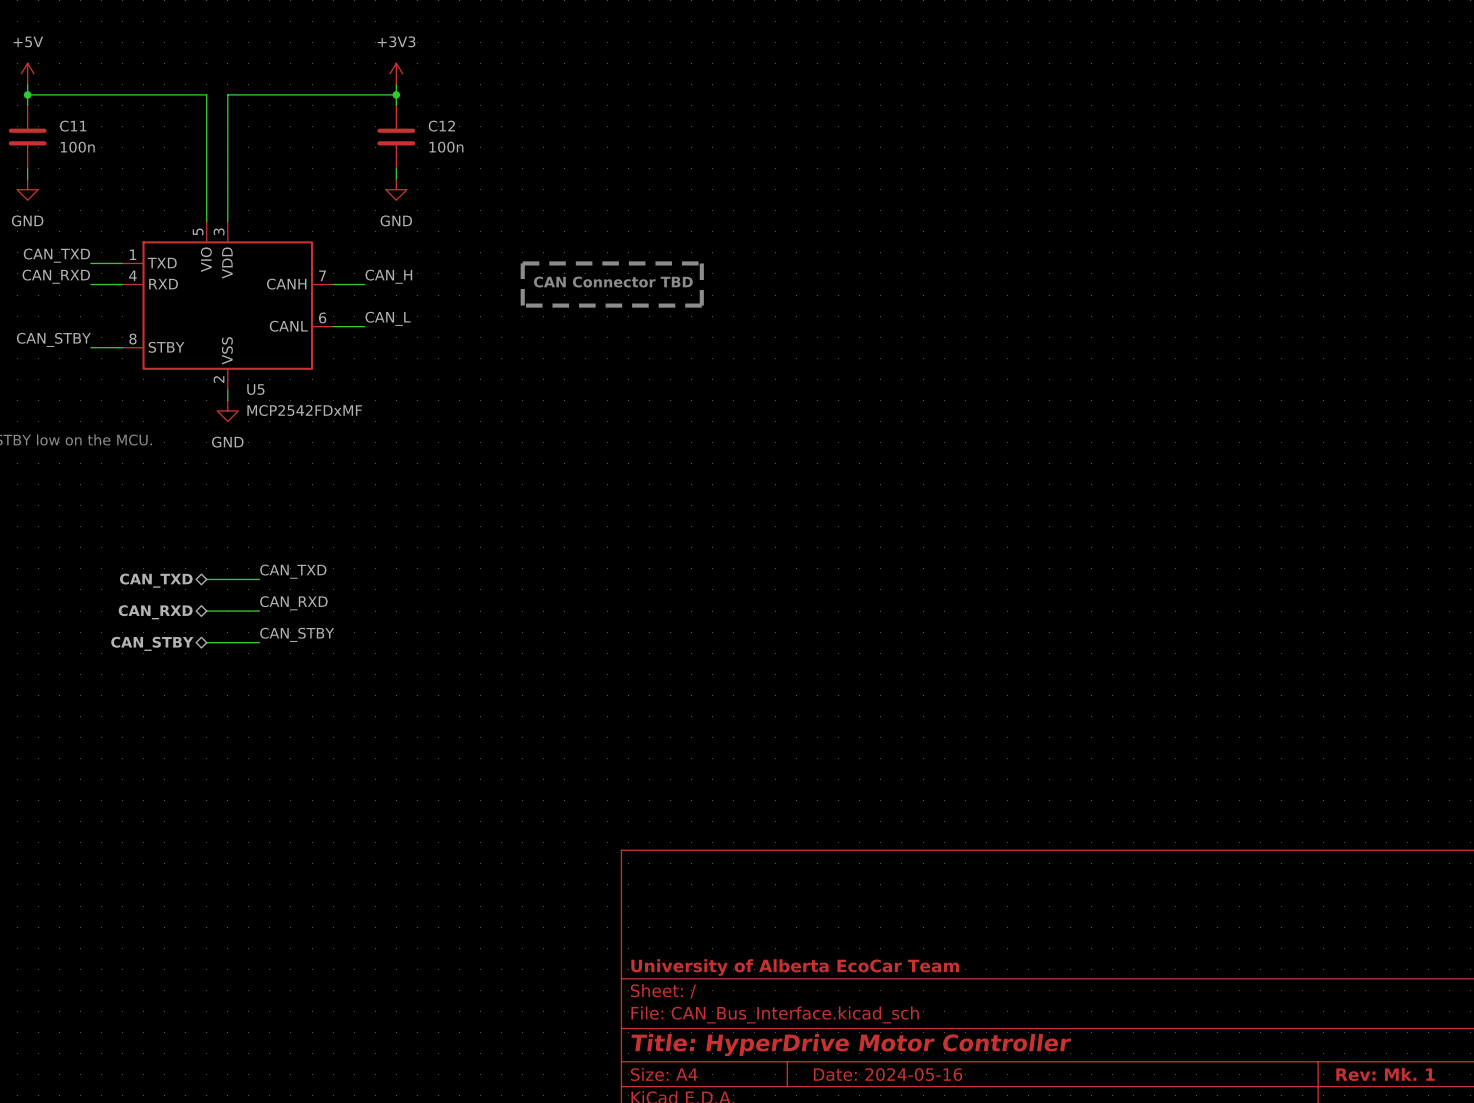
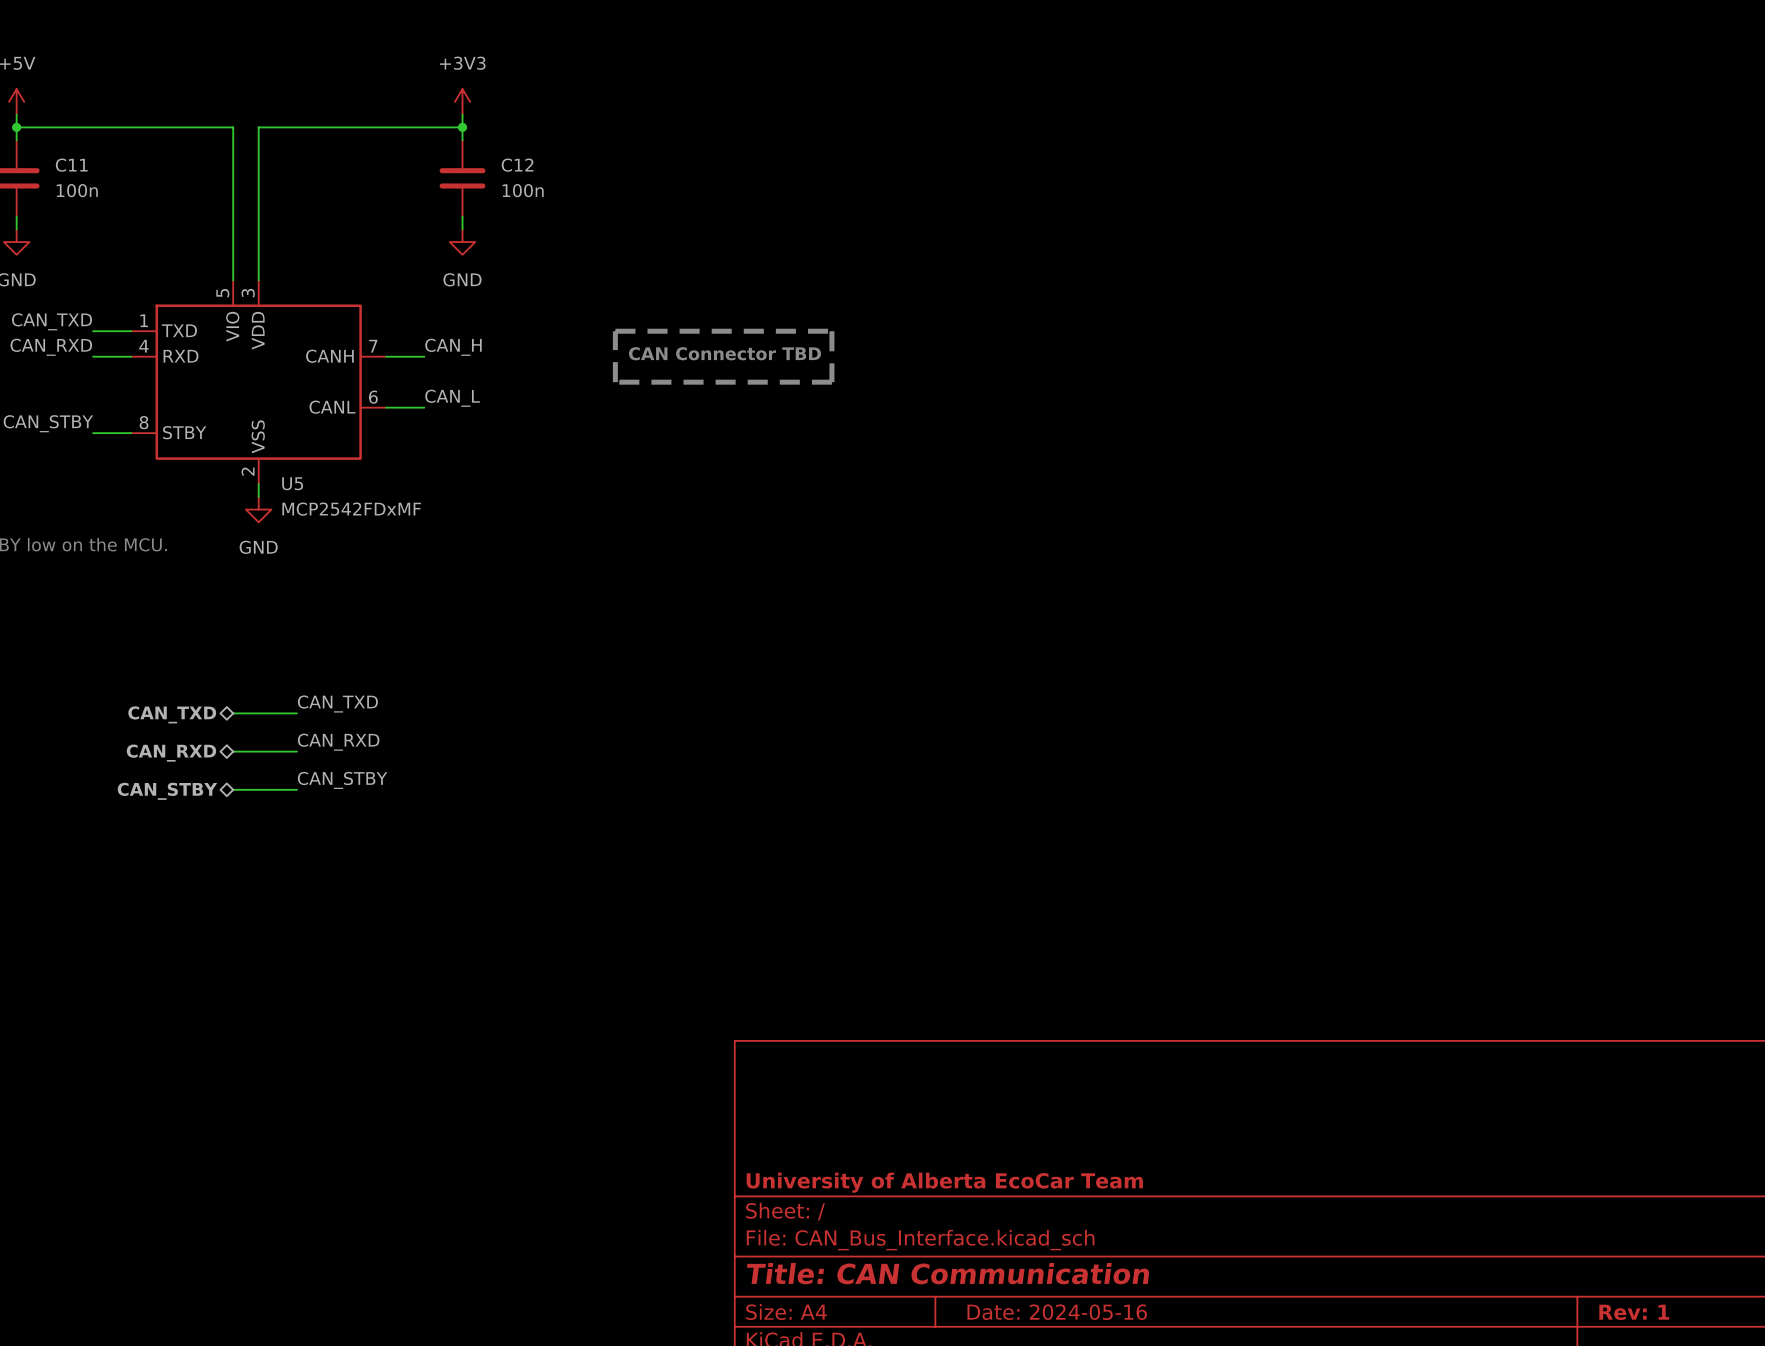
title block: Title: HyperDrive Motor Controller (851, 1045) -> Title: CAN Communication (948, 1273)
title block: Rev: Mk. 1 (1385, 1074) -> Rev: 1 (1634, 1312)

